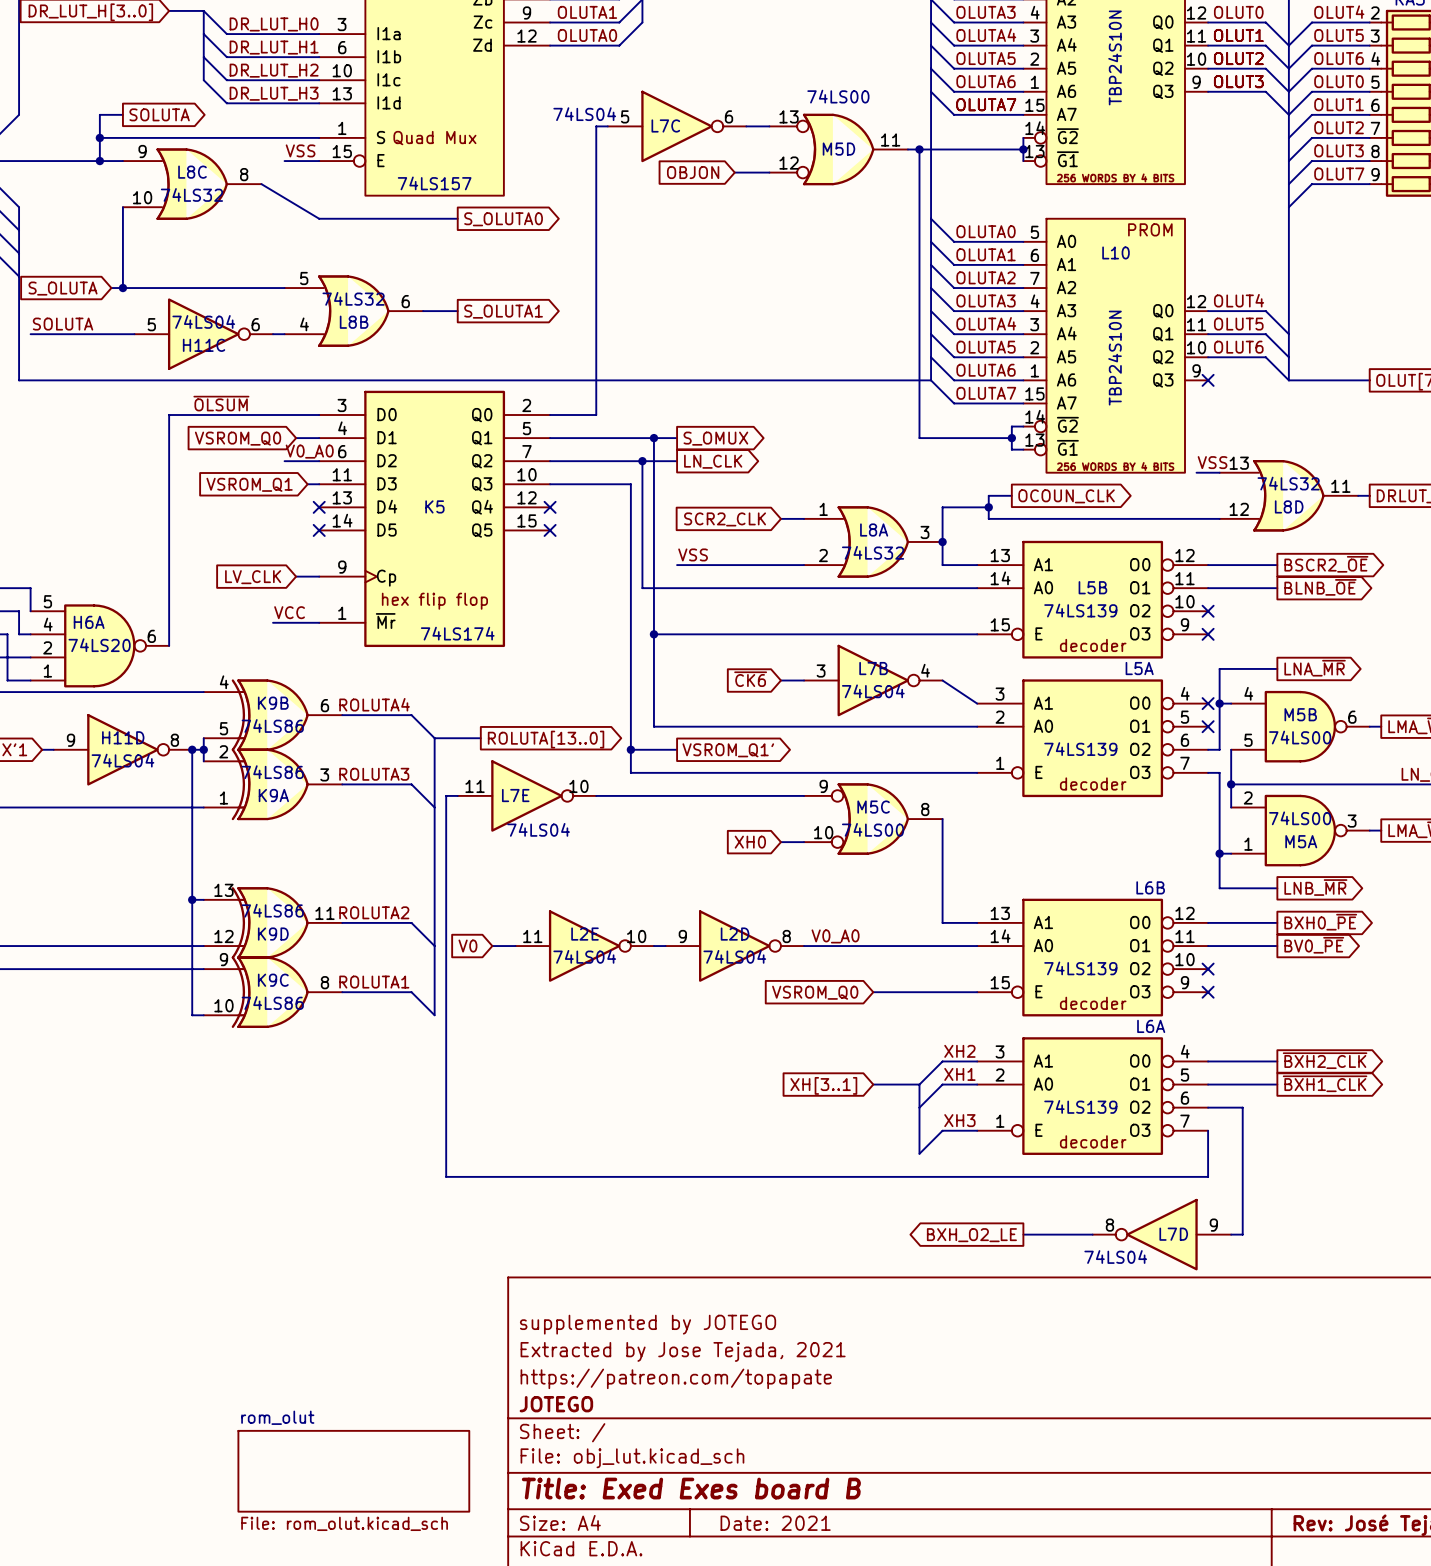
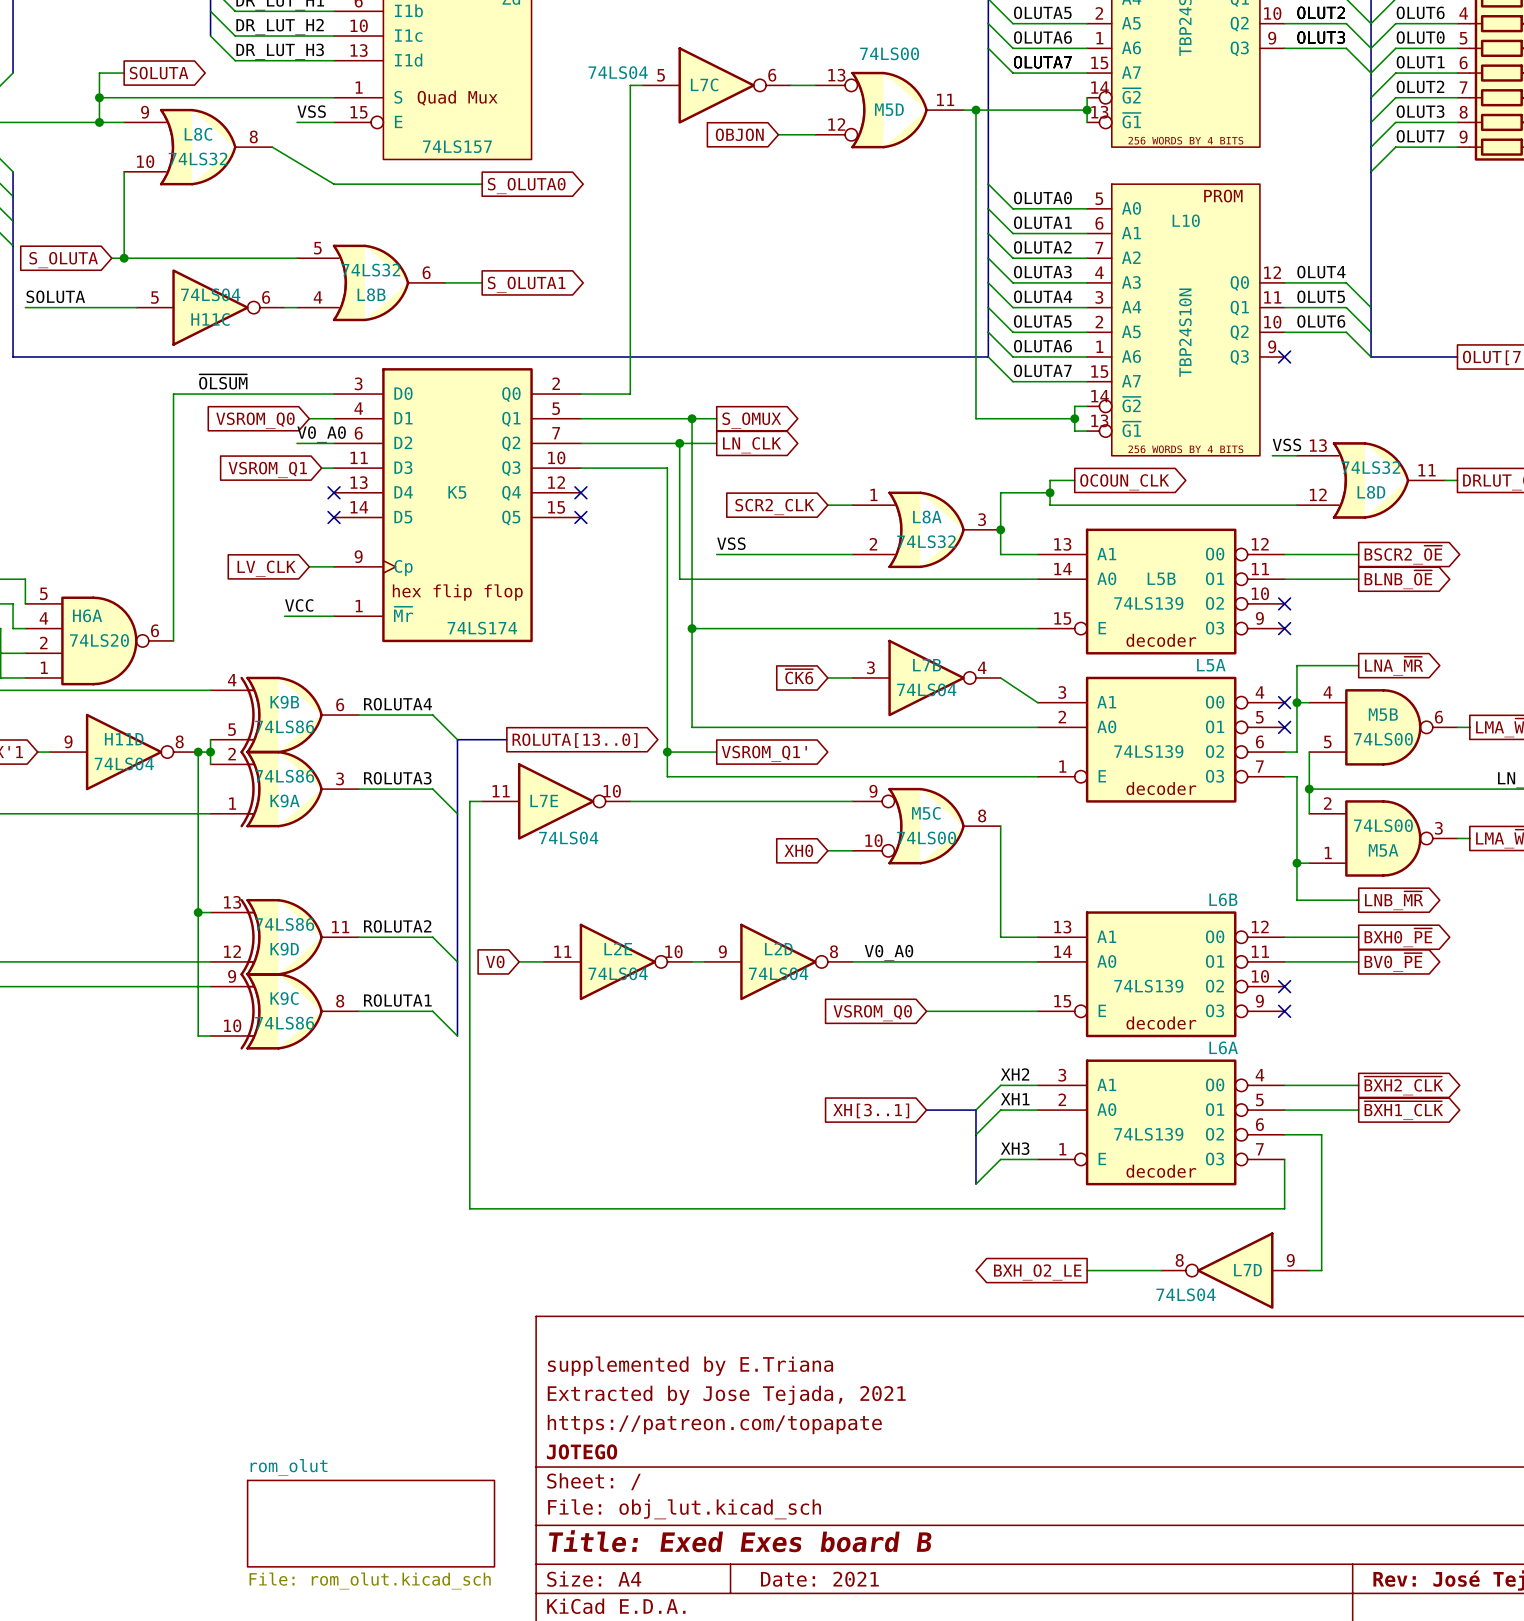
title block: supplemented by JOTEGO (648, 1324) -> supplemented by E.Triana (690, 1366)

